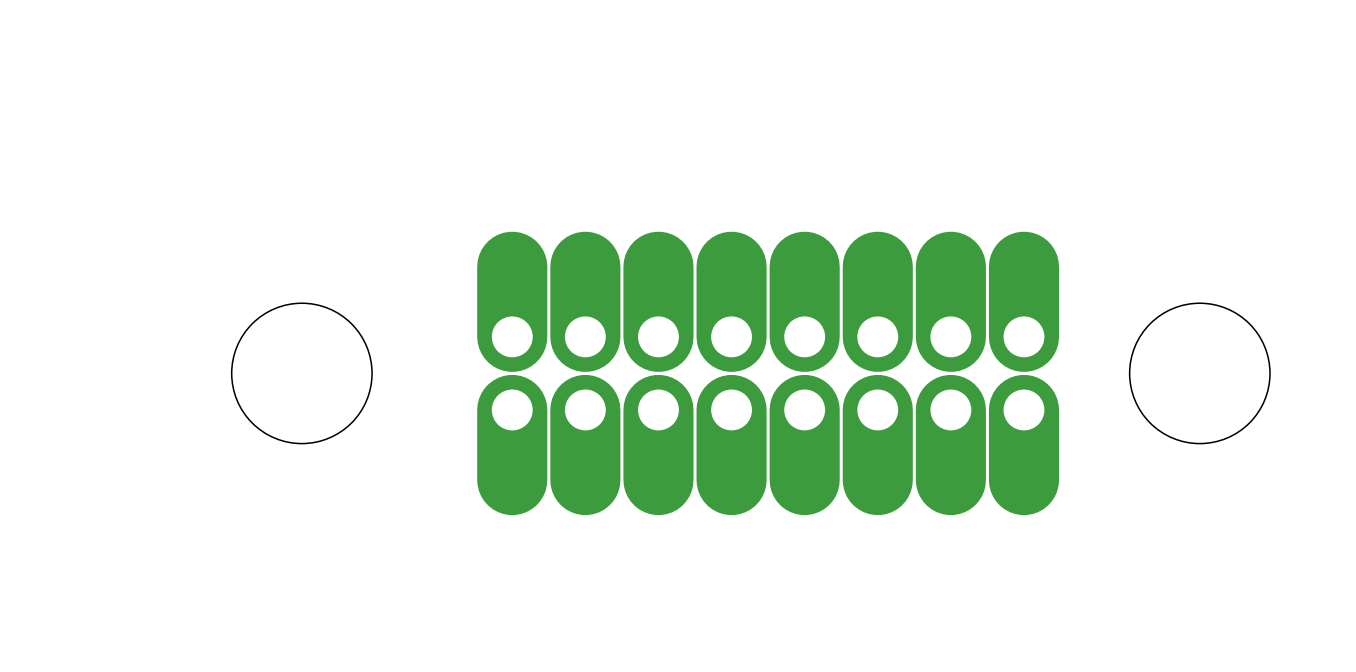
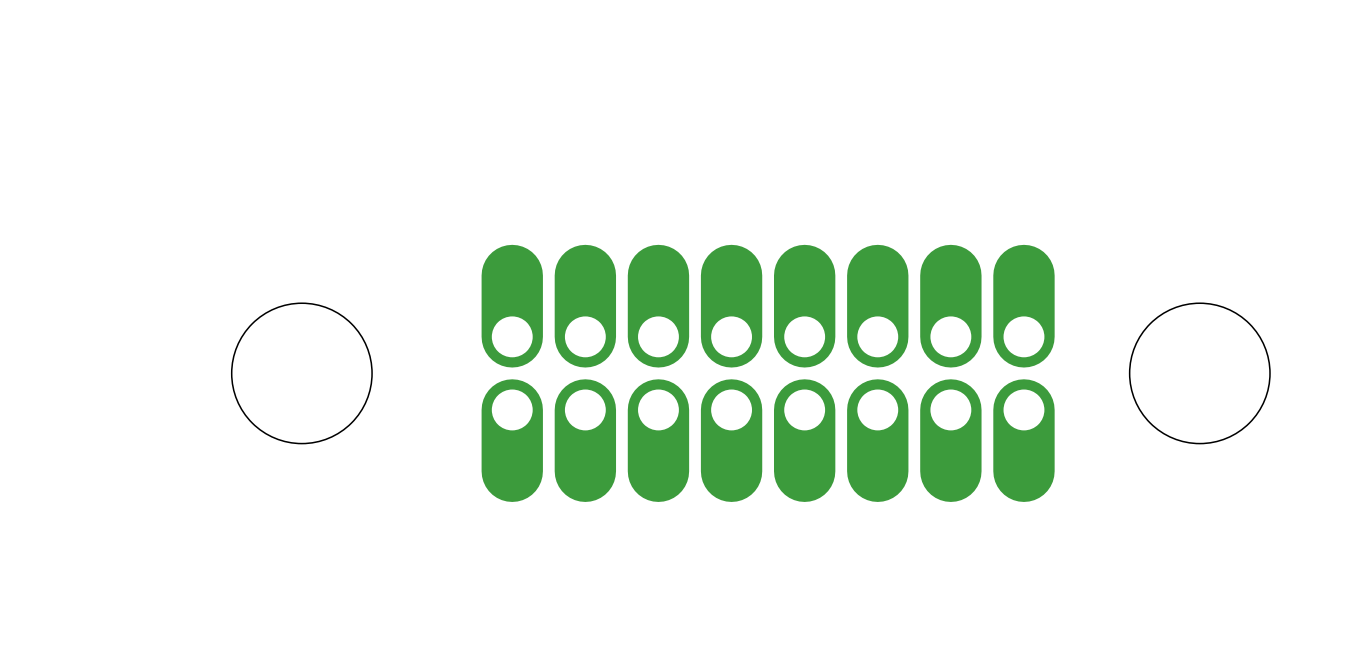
part footprint: [231, 231, 1270, 516] -> [231, 244, 1270, 502]

